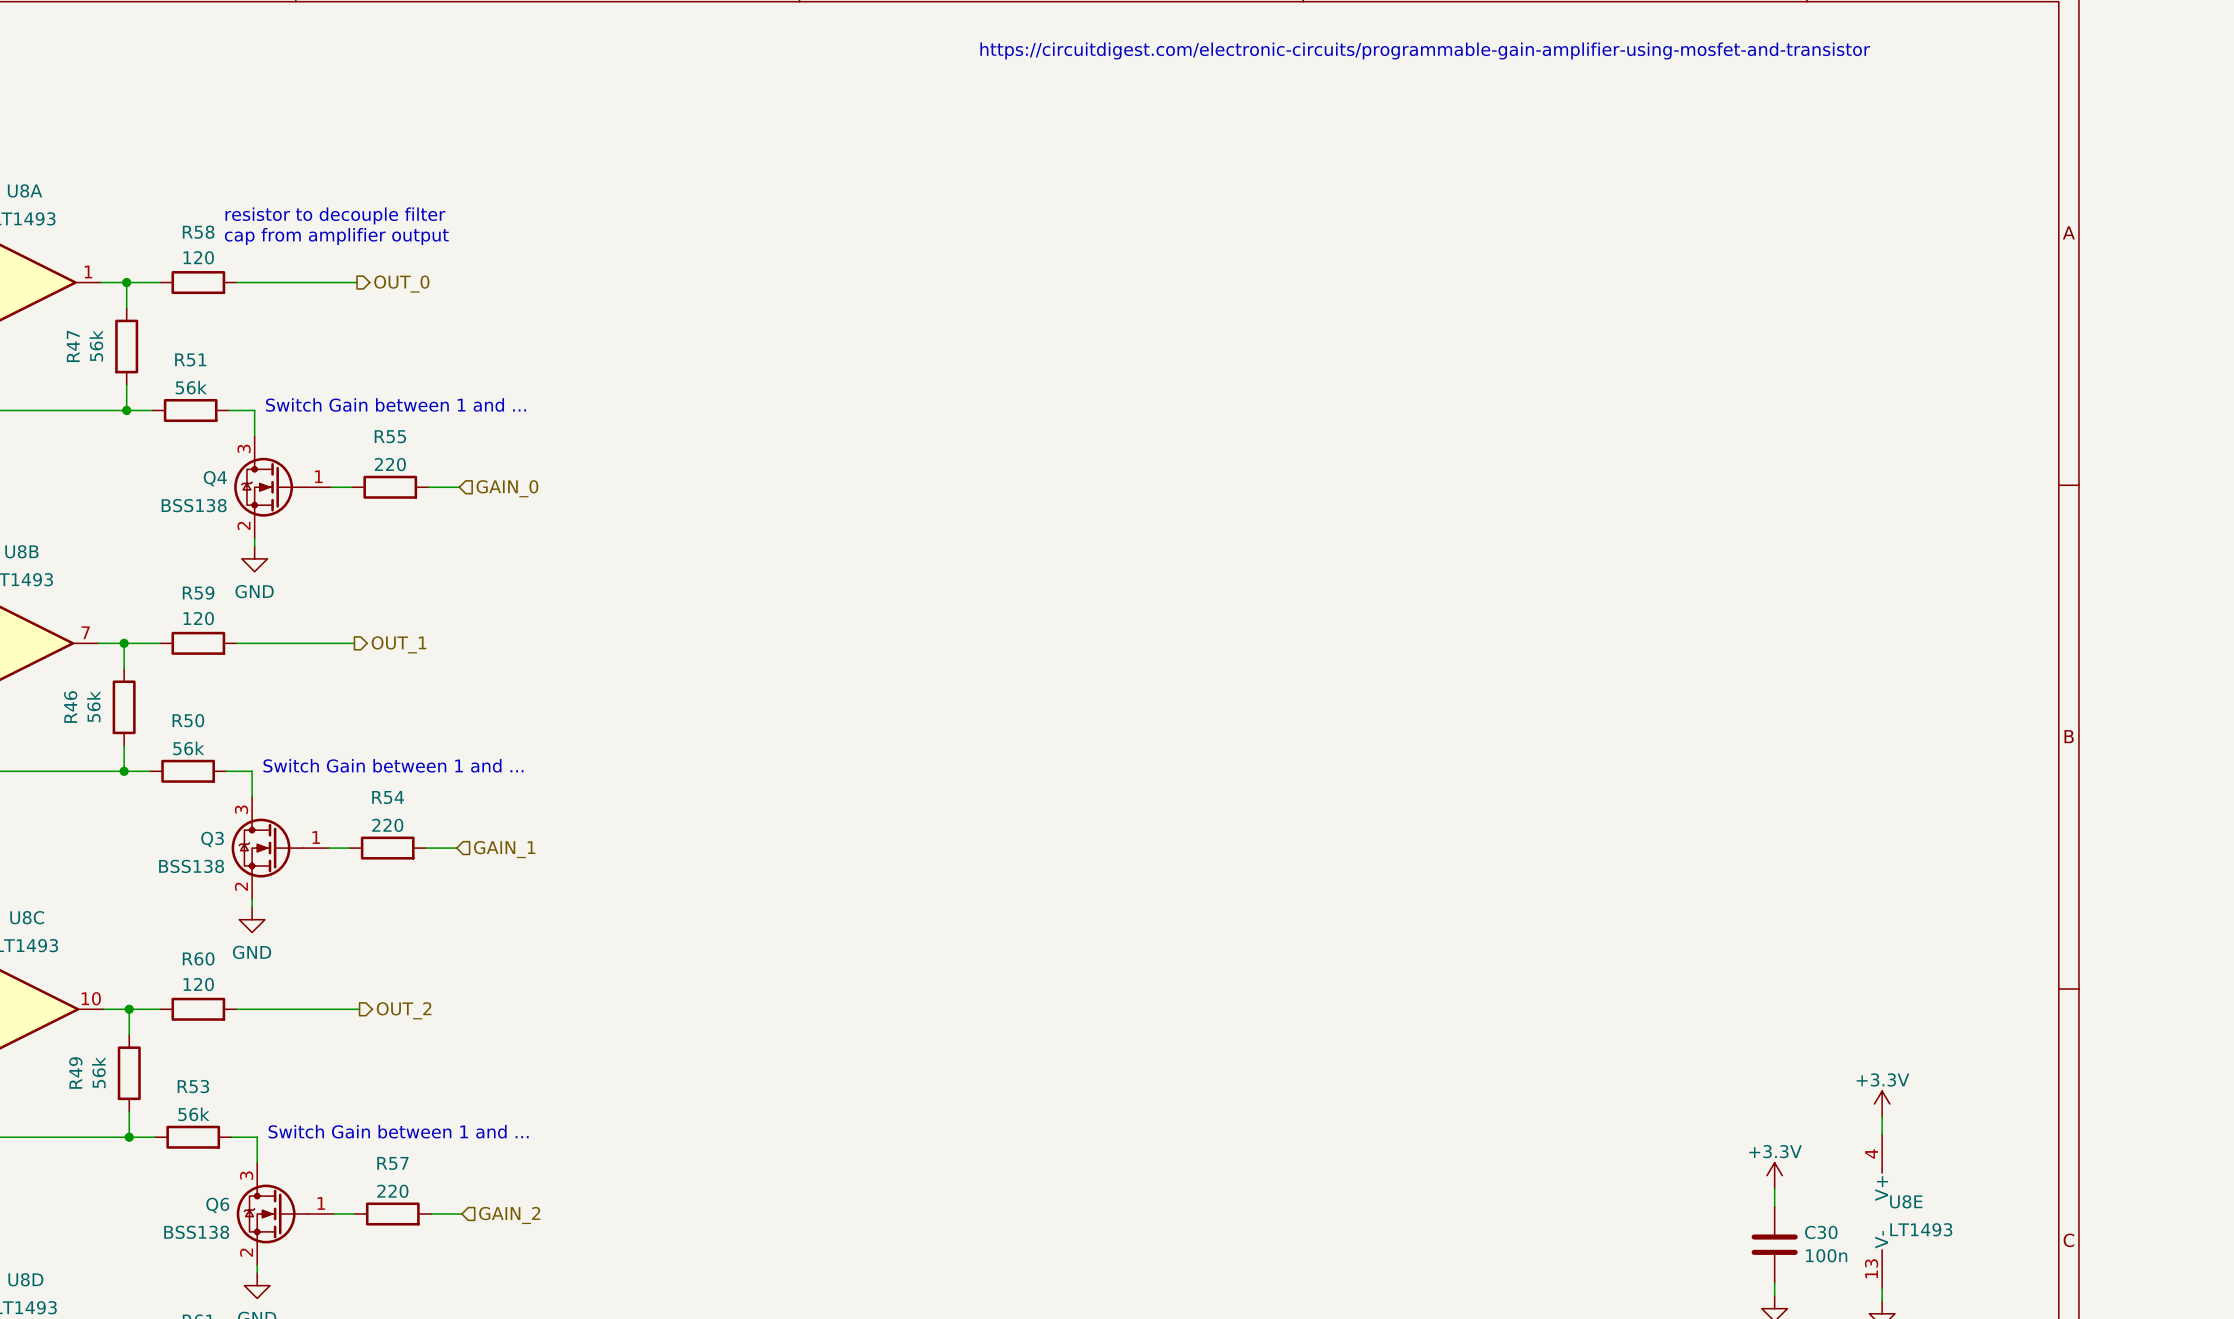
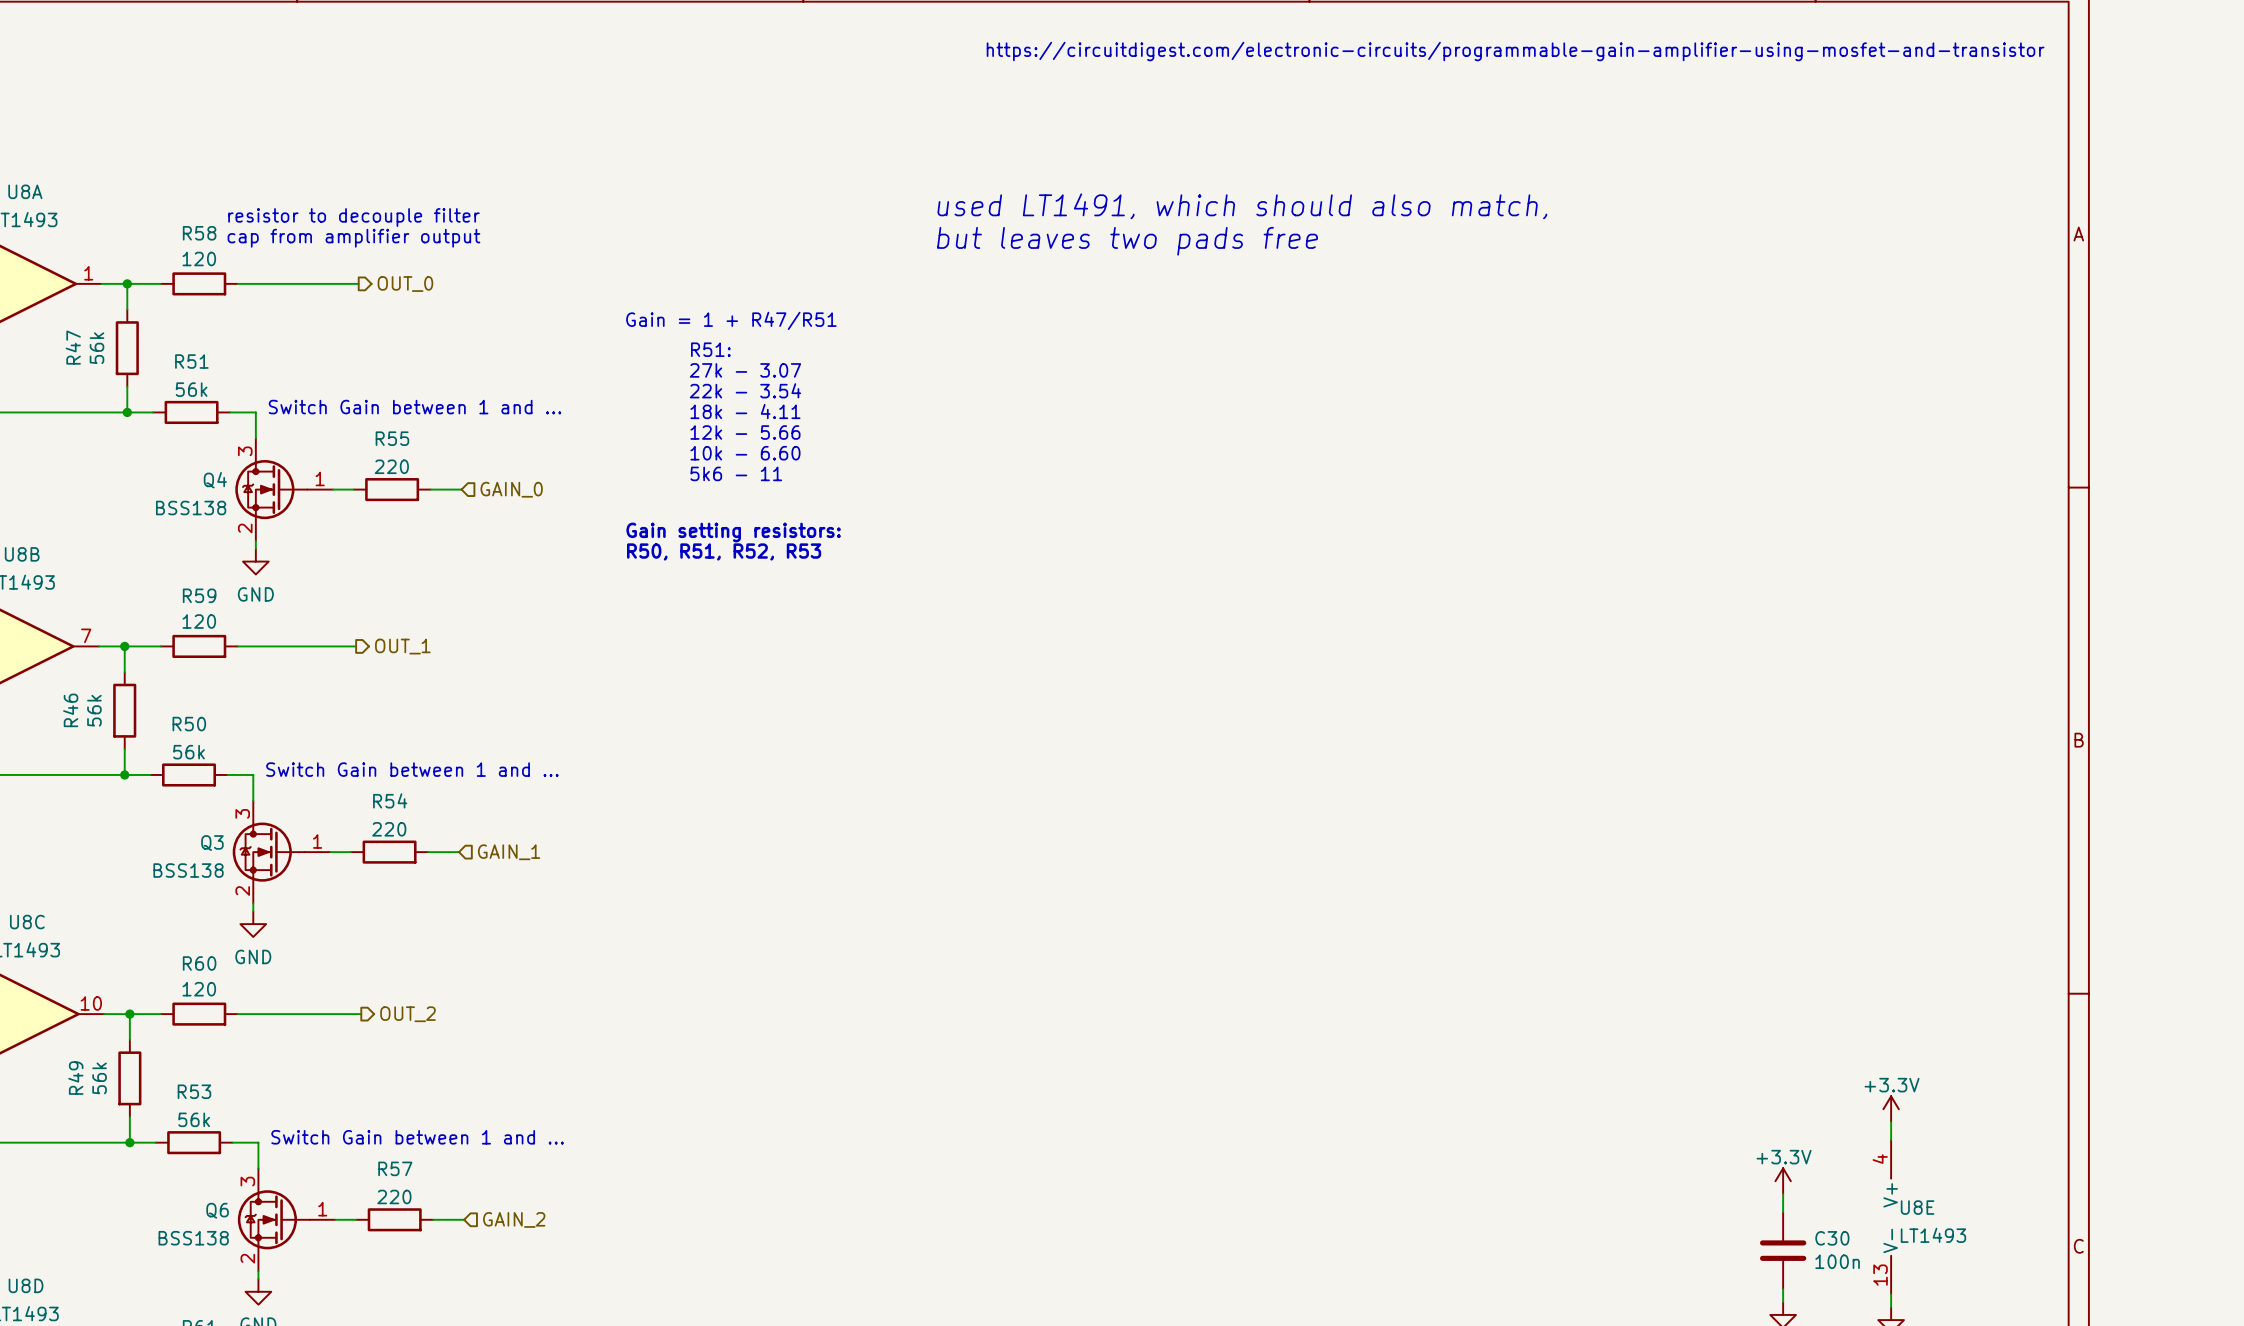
text: none -> used LT1491, which should also match, (1242, 206)
text: none -> but leaves two pads free (1127, 241)
text: none -> Gain = 1 + R47/R51 (731, 320)
text: none -> R51: (710, 349)
text: none -> 27k - 3.07 (745, 370)
text: none -> 22k - 3.54 (745, 390)
text: none -> 18k - 4.11 (745, 411)
text: none -> 12k - 5.66 (745, 432)
text: none -> 10k - 6.60 (745, 453)
text: none -> 5k6 - 11 (736, 473)
text: none -> Gain setting resistors: (733, 532)
text: none -> R50, R51, R52, R53 (724, 551)

